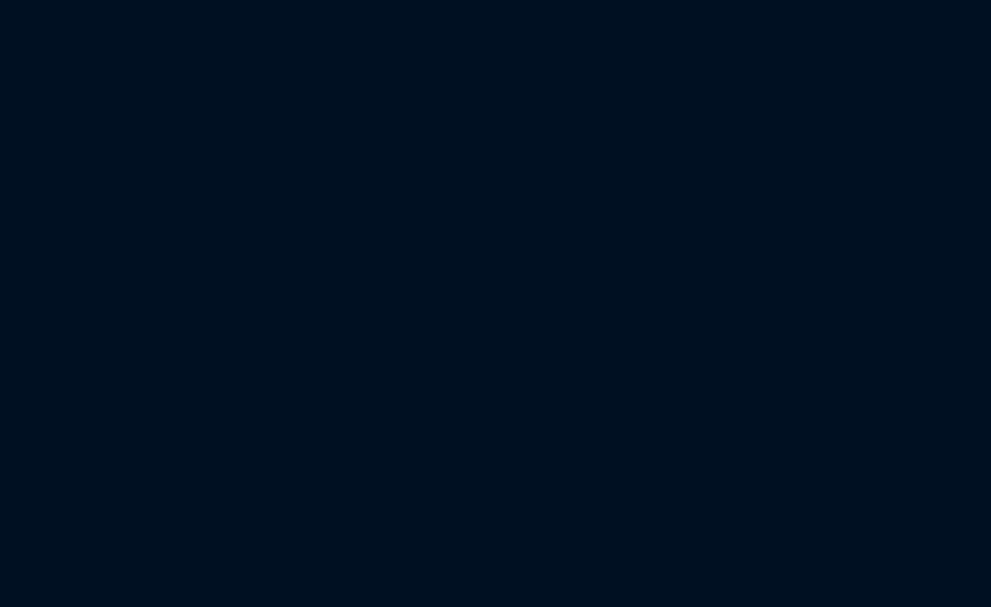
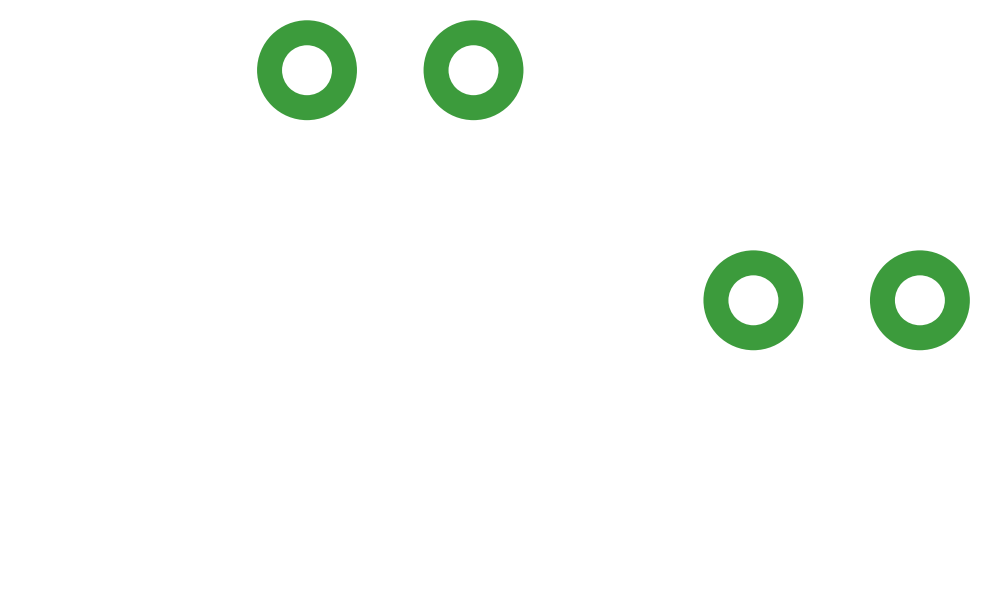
part: none -> (390, 70)
part: none -> (836, 300)

